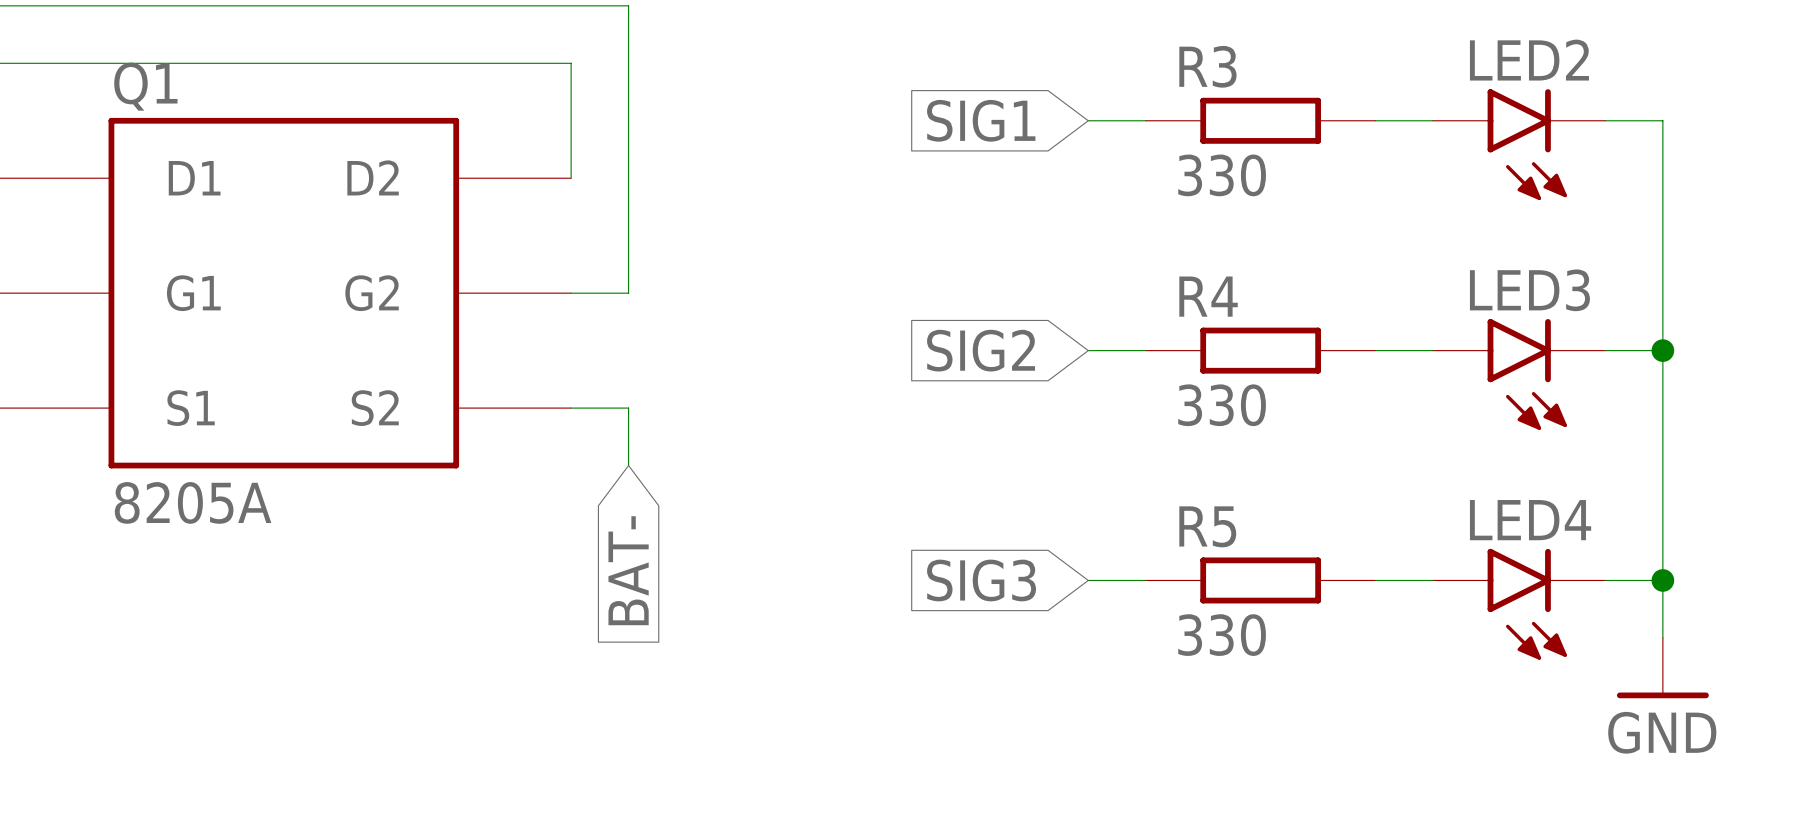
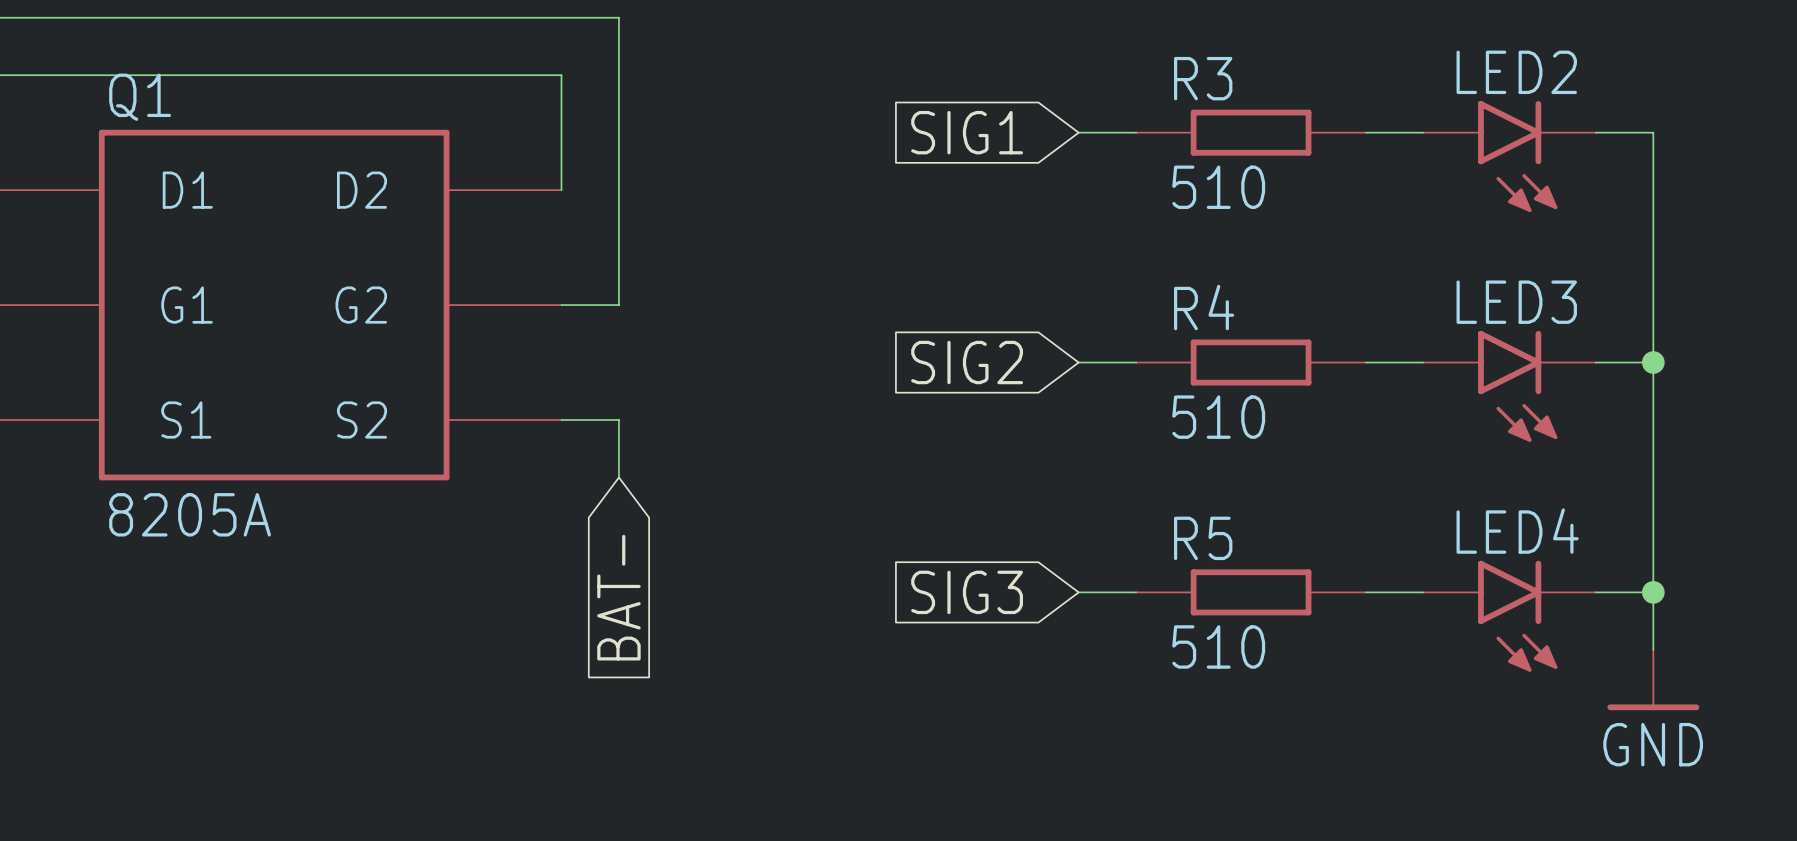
R3 value: 330 (1222, 175) -> 510 (1218, 187)
R4 value: 330 (1222, 405) -> 510 (1218, 417)
R5 value: 330 (1222, 635) -> 510 (1218, 646)

